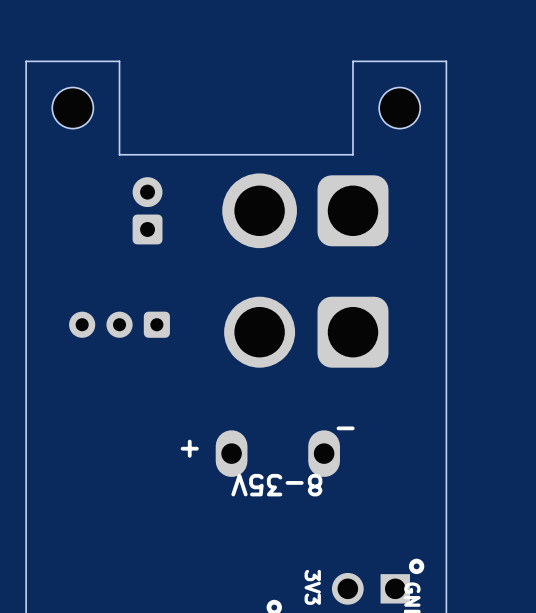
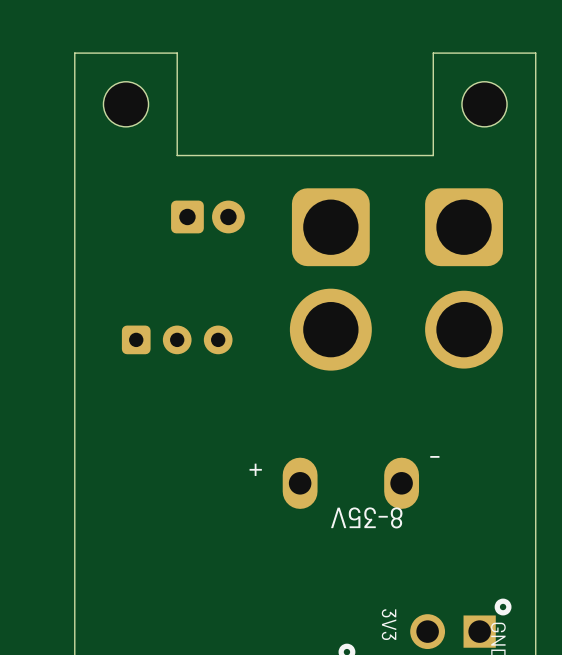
part rotation: 0° (147, 210) -> 90° clockwise (207, 216)
part rotation: 0° (305, 210) -> 90° counterclockwise (330, 279)
part rotation: 0° (119, 324) -> 180° (177, 339)
part rotation: 0° (306, 332) -> 90° counterclockwise (464, 278)
part position: (306, 332) -> (464, 278)

